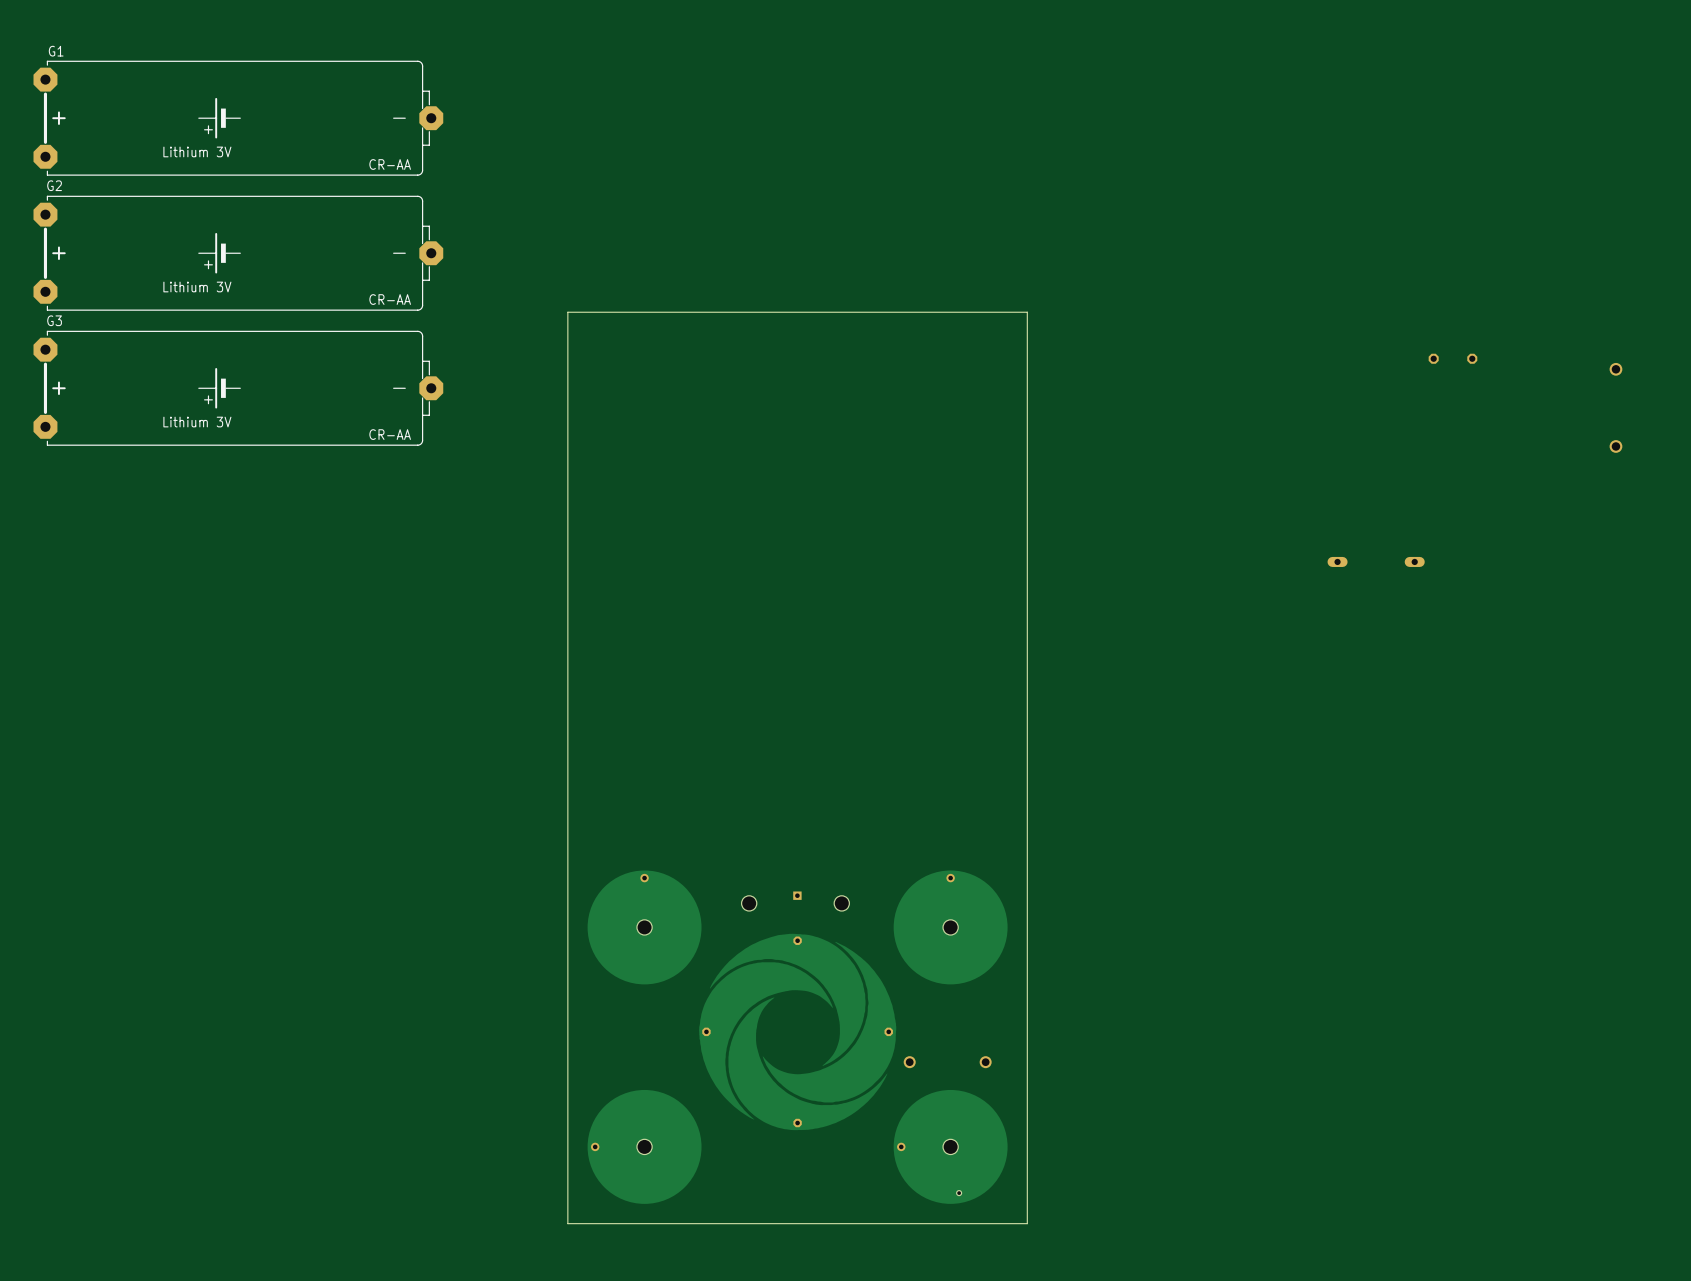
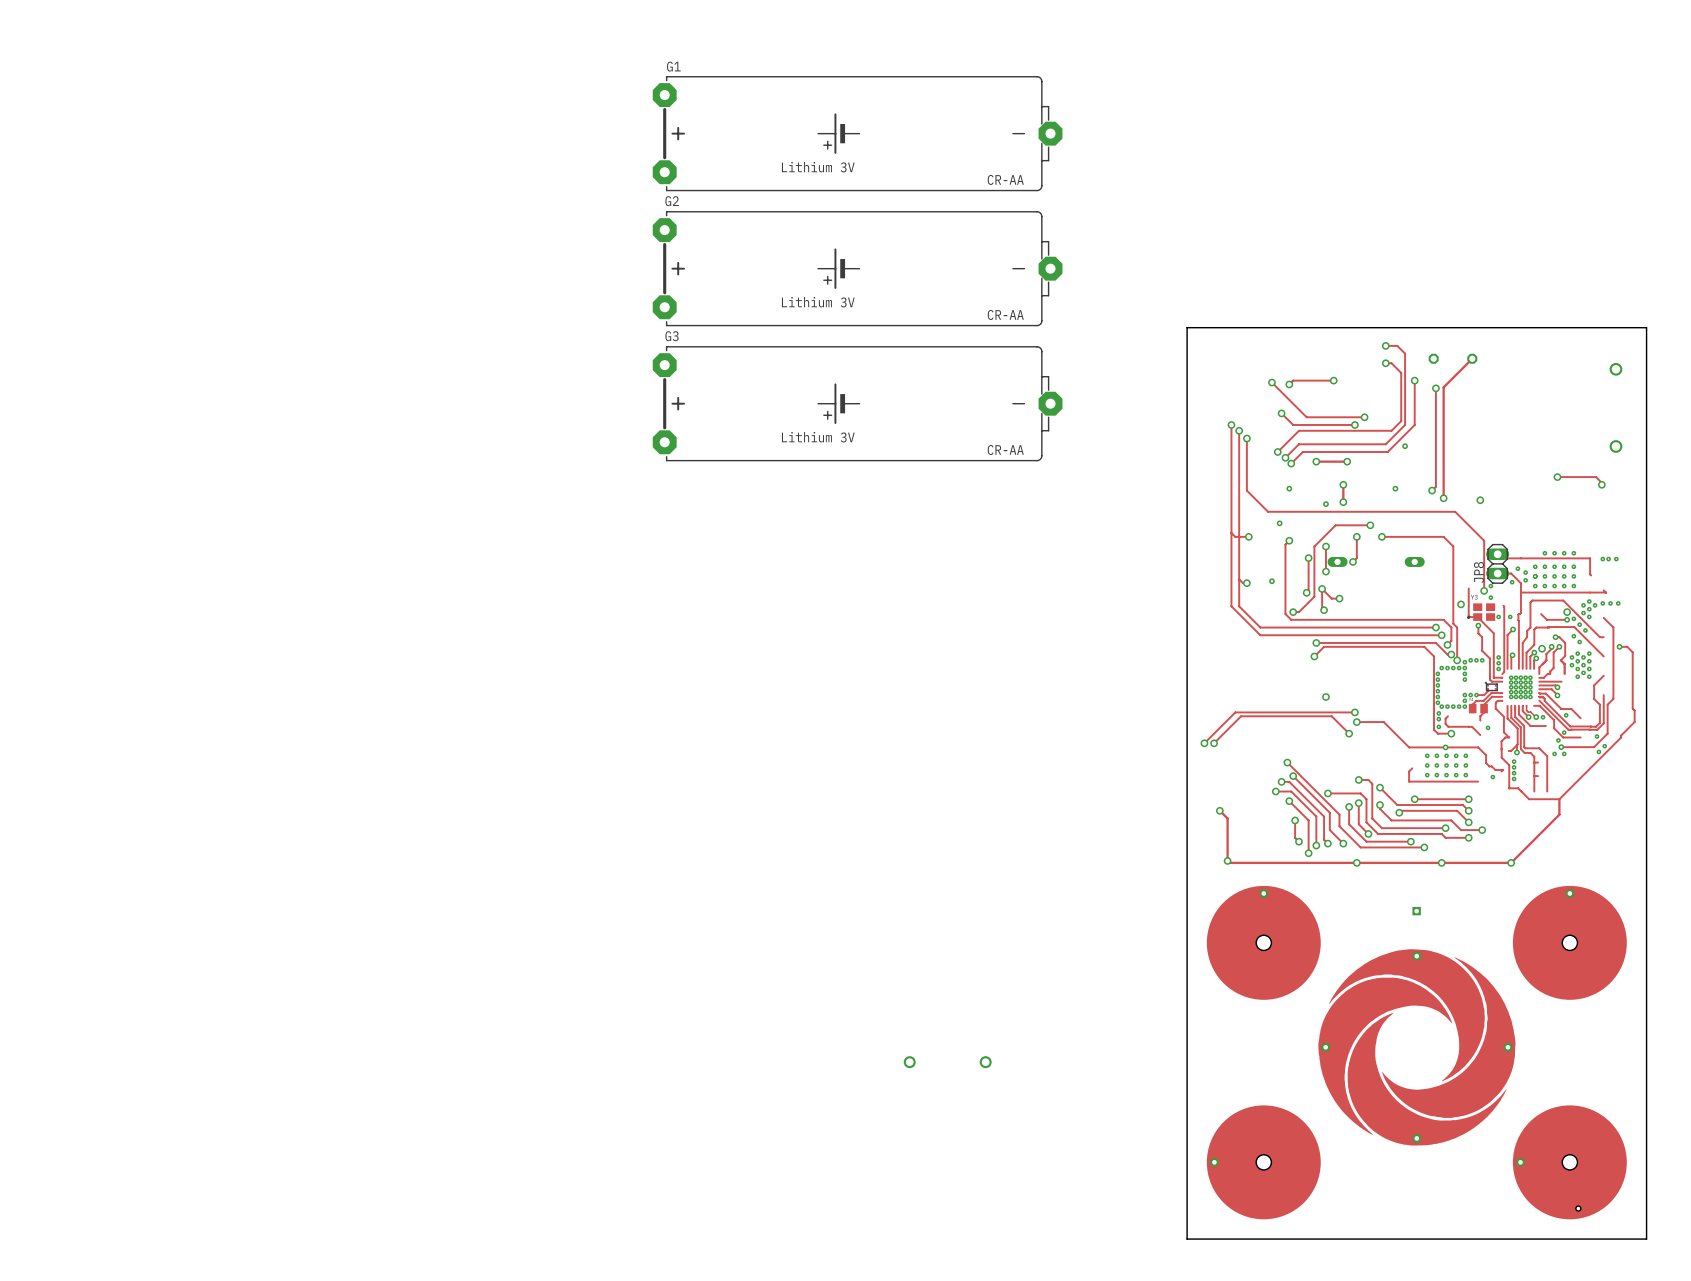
G1 position: (238, 118) -> (857, 133)
G2 position: (238, 253) -> (857, 268)
board edge: (567, 312) (1027, 312) (1027, 1223) (567, 1223) (567, 312) -> none
board edge: none -> (1187, 327) (1646, 327) (1646, 1239) (1187, 1239) (1187, 327)
track: none -> (1385, 345) (1397, 345) (1405, 353) (1405, 424) (1385, 444) (1298, 444) (1285, 457)
via: none -> (1385, 345)
track: none -> (1472, 358) (1443, 387) (1443, 498)
track: none -> (1385, 363) (1391, 363) (1401, 372) (1401, 421) (1391, 430) (1298, 430) (1277, 452)
via: none -> (1385, 363)
track: none -> (1333, 380) (1293, 380) (1289, 384)
via: none -> (1333, 380)
track: none -> (1414, 380) (1414, 424) (1387, 452) (1302, 452) (1291, 463)
via: none -> (1414, 380)
track: none -> (1271, 382) (1306, 417) (1364, 417)
via: none -> (1271, 382)
via: none -> (1289, 384)
G3 position: (238, 388) -> (857, 403)
track: none -> (1435, 388) (1435, 486) (1432, 490)
via: none -> (1435, 388)
track: none -> (1281, 413) (1293, 424) (1354, 424)
via: none -> (1281, 413)
via: none -> (1364, 417)
track: none -> (1231, 424) (1231, 606) (1260, 635) (1441, 635)
via: none -> (1231, 424)
via: none -> (1354, 424)
track: none -> (1239, 430) (1239, 606) (1260, 627) (1435, 627)
via: none -> (1239, 430)
track: none -> (1246, 438) (1246, 490) (1268, 511) (1455, 511) (1484, 540) (1484, 590)
via: none -> (1246, 438)
via: none -> (1405, 446)
via: none -> (1277, 452)
via: none -> (1285, 457)
track: none -> (1316, 461) (1347, 461)
via: none -> (1316, 461)
via: none -> (1347, 461)
via: none -> (1291, 463)
track: none -> (1557, 477) (1596, 477) (1601, 484)
via: none -> (1557, 477)
track: none -> (1343, 484) (1343, 502)
via: none -> (1343, 484)
via: none -> (1601, 484)
via: none -> (1289, 488)
via: none -> (1395, 488)
via: none -> (1432, 490)
via: none -> (1443, 498)
via: none -> (1480, 500)
via: none -> (1343, 502)
via: none -> (1325, 504)
via: none -> (1279, 523)
track: none -> (1370, 525) (1335, 525) (1314, 546) (1314, 596) (1298, 612) (1293, 612)
via: none -> (1370, 525)
track: none -> (1231, 533) (1235, 536) (1248, 536)
via: none -> (1248, 536)
track: none -> (1356, 536) (1356, 558) (1352, 561)
via: none -> (1356, 536)
track: none -> (1381, 536) (1443, 536) (1453, 546) (1453, 623) (1457, 627) (1457, 660)
via: none -> (1381, 536)
track: none -> (1289, 540) (1285, 544) (1285, 614) (1291, 619) (1443, 619) (1451, 627) (1451, 641) (1447, 644)
via: none -> (1289, 540)
track: none -> (1325, 546) (1325, 571)
via: none -> (1325, 546)
via: none -> (1544, 553)
via: none -> (1554, 553)
via: none -> (1564, 553)
via: none -> (1573, 553)
track: none -> (1497, 554) (1501, 558) (1590, 558) (1591, 575)
track: none -> (1308, 558) (1308, 590) (1306, 592)
via: none -> (1308, 558)
via: none -> (1602, 559)
via: none -> (1608, 559)
via: none -> (1616, 559)
via: none -> (1352, 561)
JP8: none -> (1497, 563)
via: none -> (1535, 566)
via: none -> (1544, 566)
via: none -> (1554, 566)
via: none -> (1564, 566)
via: none -> (1573, 566)
via: none -> (1517, 568)
via: none -> (1325, 571)
via: none -> (1525, 572)
track: none -> (1497, 573) (1511, 573) (1520, 583) (1520, 612) (1518, 614) (1518, 668)
via: none -> (1535, 576)
via: none -> (1544, 576)
via: none -> (1554, 576)
via: none -> (1564, 576)
via: none -> (1573, 576)
track: none -> (1239, 579) (1243, 583) (1246, 583)
via: none -> (1525, 580)
via: none -> (1271, 581)
via: none -> (1512, 582)
via: none -> (1246, 583)
via: none -> (1490, 586)
via: none -> (1535, 586)
via: none -> (1544, 586)
via: none -> (1554, 586)
via: none -> (1564, 586)
via: none -> (1573, 586)
via: none -> (1322, 588)
track: none -> (1468, 588) (1468, 615) (1477, 617) (1493, 633) (1493, 677) (1502, 677)
via: none -> (1484, 590)
track: none -> (1603, 590) (1606, 592)
via: none -> (1306, 592)
track: none -> (1520, 592) (1605, 592)
via: none -> (1490, 597)
track: none -> (1339, 598) (1331, 598) (1322, 588) (1322, 608) (1324, 610)
via: none -> (1339, 598)
via: none -> (1589, 601)
via: none -> (1602, 603)
via: none -> (1610, 603)
via: none -> (1618, 603)
via: none -> (1461, 604)
track: none -> (1503, 605) (1504, 672) (1502, 674)
via: none -> (1583, 605)
via: none -> (1595, 605)
via: none -> (1589, 609)
via: none -> (1324, 610)
via: none -> (1293, 612)
part: none -> (1481, 612)
via: none -> (1567, 612)
via: none -> (1583, 613)
track: none -> (1541, 614) (1546, 619) (1567, 619)
via: none -> (1498, 616)
via: none -> (1510, 616)
via: none -> (1589, 616)
track: none -> (1603, 617) (1613, 627) (1613, 698) (1607, 704) (1607, 733) (1594, 747) (1561, 747)
via: none -> (1573, 618)
via: none -> (1567, 619)
via: none -> (1579, 624)
track: none -> (1478, 625) (1478, 633) (1482, 637) (1482, 650) (1489, 658) (1489, 679) (1491, 681) (1502, 681)
via: none -> (1478, 625)
via: none -> (1435, 627)
track: none -> (1547, 627) (1574, 627) (1603, 656)
track: none -> (1549, 627) (1536, 627) (1534, 629) (1534, 644) (1526, 652) (1526, 668)
track: none -> (1513, 629) (1507, 635) (1507, 668)
via: none -> (1513, 629)
via: none -> (1585, 630)
via: none -> (1441, 635)
via: none -> (1573, 636)
track: none -> (1555, 637) (1559, 637) (1565, 642) (1565, 655) (1560, 660) (1564, 664) (1564, 673)
via: none -> (1555, 637)
track: none -> (1603, 637) (1599, 637) (1563, 600) (1532, 600) (1530, 602) (1530, 627) (1527, 630) (1527, 637) (1522, 642) (1522, 668)
track: none -> (1316, 642) (1435, 642) (1447, 654) (1451, 654)
via: none -> (1316, 642)
via: none -> (1579, 642)
via: none -> (1447, 644)
track: none -> (1551, 646) (1546, 654) (1546, 660) (1539, 667) (1539, 674)
via: none -> (1551, 646)
track: none -> (1559, 646) (1553, 652) (1553, 668) (1550, 673) (1543, 677) (1539, 677)
via: none -> (1559, 646)
track: none -> (1619, 646) (1627, 646) (1632, 652) (1632, 708) (1634, 710) (1634, 722) (1559, 799)
via: none -> (1619, 646)
via: none -> (1542, 648)
track: none -> (1534, 652) (1530, 656) (1530, 668)
via: none -> (1534, 652)
via: none -> (1577, 653)
via: none -> (1589, 653)
via: none -> (1451, 654)
track: none -> (1512, 655) (1511, 668)
via: none -> (1512, 655)
track: none -> (1314, 656) (1324, 646) (1424, 646) (1434, 656) (1434, 729) (1437, 733) (1451, 733)
via: none -> (1314, 656)
via: none -> (1498, 657)
via: none -> (1571, 657)
via: none -> (1583, 657)
track: none -> (1536, 658) (1534, 660) (1534, 668)
via: none -> (1536, 658)
via: none -> (1457, 660)
via: none -> (1470, 660)
via: none -> (1476, 660)
via: none -> (1482, 660)
via: none -> (1577, 661)
via: none -> (1589, 661)
via: none -> (1464, 662)
via: none -> (1498, 663)
via: none -> (1571, 665)
via: none -> (1583, 665)
via: none -> (1441, 668)
via: none -> (1447, 668)
via: none -> (1453, 668)
via: none -> (1459, 668)
via: none -> (1464, 668)
via: none -> (1498, 669)
via: none -> (1577, 669)
via: none -> (1589, 669)
via: none -> (1583, 672)
via: none -> (1437, 673)
via: none -> (1464, 673)
track: none -> (1603, 675) (1594, 685) (1594, 698) (1599, 704) (1599, 722) (1596, 726) (1570, 726) (1543, 697) (1539, 696) (1542, 696)
via: none -> (1577, 676)
via: none -> (1589, 676)
via: none -> (1511, 677)
via: none -> (1515, 677)
via: none -> (1520, 677)
via: none -> (1525, 677)
via: none -> (1530, 677)
via: none -> (1437, 679)
via: none -> (1464, 679)
track: none -> (1539, 681) (1561, 681)
via: none -> (1511, 682)
via: none -> (1515, 682)
via: none -> (1520, 682)
via: none -> (1525, 682)
via: none -> (1530, 682)
via: none -> (1437, 685)
track: none -> (1539, 685) (1555, 685) (1557, 687)
part: none -> (1491, 686)
via: none -> (1511, 687)
via: none -> (1515, 687)
via: none -> (1520, 687)
via: none -> (1525, 687)
via: none -> (1530, 687)
via: none -> (1557, 687)
track: none -> (1488, 688) (1484, 695) (1476, 695)
track: none -> (1539, 689) (1551, 689) (1557, 695)
via: none -> (1437, 691)
via: none -> (1511, 692)
via: none -> (1515, 692)
via: none -> (1520, 692)
via: none -> (1525, 692)
via: none -> (1530, 692)
track: none -> (1502, 693) (1491, 693) (1483, 700) (1476, 700) (1472, 704) (1472, 712)
track: none -> (1539, 693) (1545, 693) (1561, 709) (1571, 709) (1580, 718)
via: none -> (1464, 695)
via: none -> (1470, 695)
via: none -> (1476, 695)
via: none -> (1557, 695)
track: none -> (1603, 695) (1603, 723) (1597, 729) (1568, 729) (1539, 700)
via: none -> (1325, 696)
via: none -> (1437, 696)
track: none -> (1502, 696) (1492, 696) (1484, 704) (1484, 712) (1480, 716) (1480, 720)
via: none -> (1511, 696)
via: none -> (1515, 696)
via: none -> (1520, 696)
via: none -> (1525, 696)
via: none -> (1530, 696)
via: none -> (1464, 700)
track: none -> (1502, 700) (1495, 702) (1495, 708)
via: none -> (1437, 702)
track: none -> (1507, 705) (1507, 718) (1517, 728) (1517, 744) (1508, 751)
track: none -> (1511, 705) (1511, 717) (1520, 727) (1520, 749) (1534, 756) (1534, 791)
track: none -> (1515, 705) (1515, 716) (1524, 725) (1524, 747) (1539, 748) (1547, 756) (1547, 791)
track: none -> (1518, 705) (1518, 714) (1530, 726) (1545, 726)
track: none -> (1522, 705) (1522, 711) (1528, 717)
track: none -> (1526, 705) (1526, 710) (1536, 717)
track: none -> (1534, 705) (1540, 705) (1554, 720) (1554, 728) (1563, 737) (1580, 737)
via: none -> (1441, 706)
via: none -> (1447, 706)
via: none -> (1453, 706)
via: none -> (1459, 706)
via: none -> (1464, 706)
part: none -> (1478, 708)
track: none -> (1495, 708) (1503, 716) (1503, 732) (1509, 737) (1505, 737) (1501, 741) (1501, 749) (1501, 757) (1509, 765) (1509, 788)
track: none -> (1354, 712) (1235, 712) (1204, 743)
via: none -> (1354, 712)
via: none -> (1438, 713)
via: none -> (1566, 715)
track: none -> (1448, 716) (1445, 718) (1445, 724) (1448, 726) (1472, 726) (1480, 735)
via: none -> (1528, 717)
via: none -> (1536, 717)
via: none -> (1543, 717)
via: none -> (1438, 719)
track: none -> (1356, 722) (1383, 722) (1409, 747) (1478, 747) (1486, 755) (1486, 763) (1495, 769) (1503, 769) (1501, 771)
via: none -> (1356, 722)
via: none -> (1438, 726)
via: none -> (1488, 727)
via: none -> (1564, 732)
track: none -> (1349, 733) (1331, 716) (1241, 716) (1214, 743)
via: none -> (1349, 733)
via: none -> (1451, 733)
via: none -> (1597, 736)
via: none -> (1558, 740)
via: none -> (1204, 743)
via: none -> (1214, 743)
track: none -> (1516, 745) (1516, 752)
via: none -> (1604, 746)
via: none -> (1445, 747)
via: none -> (1561, 747)
via: none -> (1598, 751)
via: none -> (1516, 752)
via: none -> (1554, 753)
via: none -> (1564, 753)
via: none -> (1427, 755)
via: none -> (1436, 755)
via: none -> (1446, 755)
via: none -> (1456, 755)
via: none -> (1465, 755)
via: none -> (1514, 761)
track: none -> (1287, 762) (1339, 814) (1339, 826) (1360, 847) (1424, 847)
via: none -> (1287, 762)
track: none -> (1534, 762) (1538, 762)
via: none -> (1427, 765)
via: none -> (1436, 765)
via: none -> (1446, 765)
via: none -> (1456, 765)
via: none -> (1465, 765)
via: none -> (1514, 767)
track: none -> (1412, 768) (1409, 771) (1409, 781) (1478, 781)
via: none -> (1514, 773)
via: none -> (1427, 775)
via: none -> (1436, 775)
via: none -> (1446, 775)
via: none -> (1456, 775)
via: none -> (1465, 775)
track: none -> (1293, 776) (1329, 812) (1329, 830) (1343, 843)
via: none -> (1293, 776)
track: none -> (1534, 776) (1538, 776)
via: none -> (1492, 777)
via: none -> (1514, 778)
track: none -> (1358, 779) (1368, 779) (1372, 783) (1372, 818) (1381, 828) (1445, 828)
via: none -> (1358, 779)
track: none -> (1281, 781) (1289, 781) (1324, 816) (1324, 839) (1327, 843)
via: none -> (1281, 781)
track: none -> (1379, 787) (1397, 805) (1462, 805) (1468, 810)
via: none -> (1379, 787)
track: none -> (1508, 788) (1518, 788) (1529, 799) (1559, 799)
track: none -> (1275, 791) (1291, 791) (1316, 816) (1316, 845)
via: none -> (1275, 791)
track: none -> (1327, 793) (1360, 793) (1366, 799) (1366, 822) (1378, 833) (1441, 833) (1445, 837) (1468, 837)
via: none -> (1327, 793)
track: none -> (1414, 799) (1468, 799)
via: none -> (1414, 799)
via: none -> (1468, 799)
track: none -> (1559, 799) (1559, 814) (1511, 862) (1229, 862) (1227, 860) (1227, 818) (1219, 810)
track: none -> (1289, 801) (1308, 820) (1308, 853)
via: none -> (1289, 801)
track: none -> (1358, 803) (1358, 824) (1368, 833)
via: none -> (1358, 803)
track: none -> (1379, 805) (1379, 808) (1391, 820) (1451, 820) (1461, 830) (1482, 830)
via: none -> (1379, 805)
track: none -> (1349, 806) (1349, 824) (1366, 841) (1410, 841)
via: none -> (1349, 806)
via: none -> (1219, 810)
via: none -> (1468, 810)
track: none -> (1399, 812) (1401, 810) (1457, 810) (1468, 822)
via: none -> (1399, 812)
track: none -> (1295, 820) (1295, 837) (1298, 841)
via: none -> (1295, 820)
via: none -> (1468, 822)
via: none -> (1445, 828)
via: none -> (1482, 830)
via: none -> (1368, 833)
via: none -> (1468, 837)
via: none -> (1298, 841)
via: none -> (1410, 841)
via: none -> (1327, 843)
via: none -> (1343, 843)
via: none -> (1316, 845)
via: none -> (1424, 847)
via: none -> (1308, 853)
via: none -> (1227, 860)
via: none -> (1356, 862)
via: none -> (1441, 862)
via: none -> (1511, 862)
part: (797, 895) -> none
hole: (749, 903) -> none
hole: (841, 903) -> none
part: none -> (1416, 911)
part: (644, 927) -> none
part: (950, 927) -> none
part: none -> (1263, 942)
part: none -> (1569, 942)
part: (797, 1031) -> none
part: none -> (1416, 1047)
part: (644, 1146) -> none
part: (950, 1146) -> none
part: none -> (1263, 1162)
part: none -> (1569, 1162)
part: (959, 1193) -> none
part: none -> (1578, 1208)

